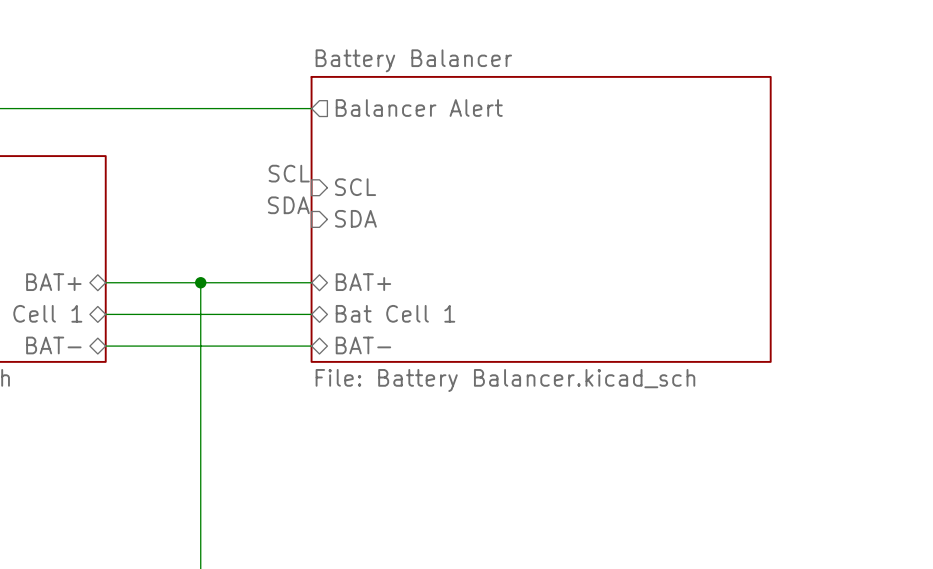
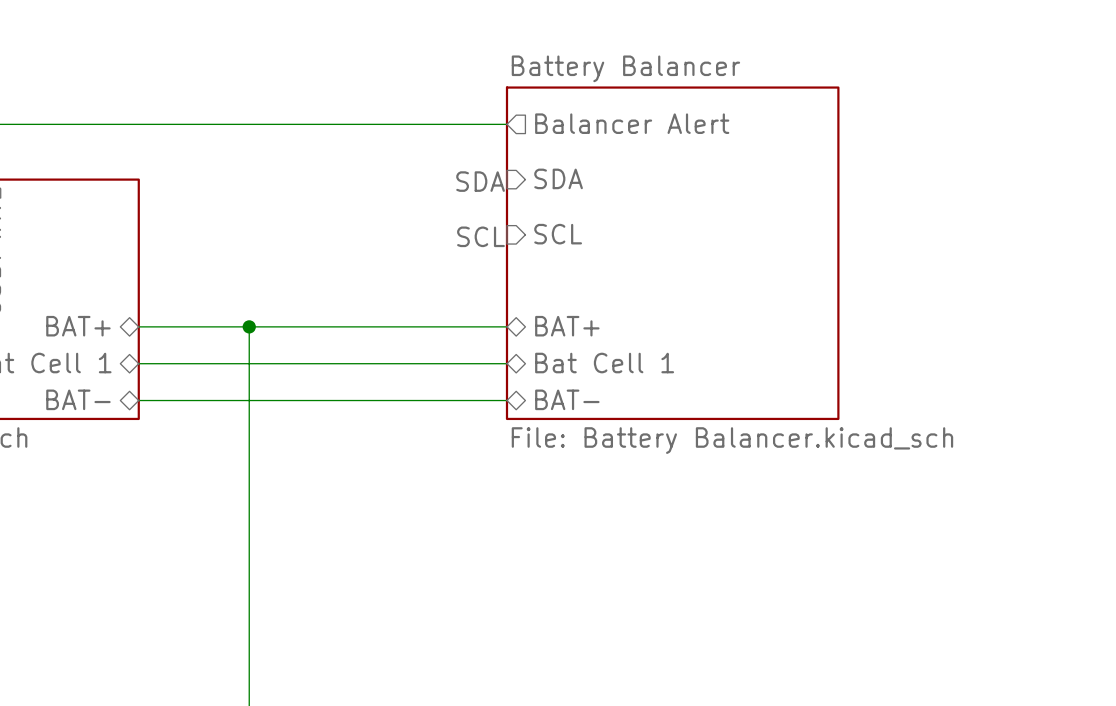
sheet pin position: Balancer Alert (419, 107) -> Balancer Alert (632, 123)
wire: none -> (378, 124) (507, 124)
label position: SCL (289, 173) -> SCL (480, 236)
sheet pin position: SCL (355, 187) -> SCL (558, 234)
label position: SDA (288, 205) -> SDA (480, 181)
sheet pin position: SDA (355, 218) -> SDA (558, 178)
sheet Battery Balancer: File: Battery Balancer.kicad_sch (541, 219) -> none
sheet Battery Balancer: none -> File: Battery Balancer.kicad_sch (672, 253)
wire: none -> (378, 326) (507, 326)
sheet pin position: BAT+ (363, 282) -> BAT+ (567, 326)
sheet pin position: Bat Cell 1 (395, 313) -> Bat Cell 1 (604, 363)
wire: none -> (378, 363) (507, 363)
sheet pin position: BAT- (363, 345) -> BAT- (567, 399)
wire: none -> (378, 400) (507, 400)

